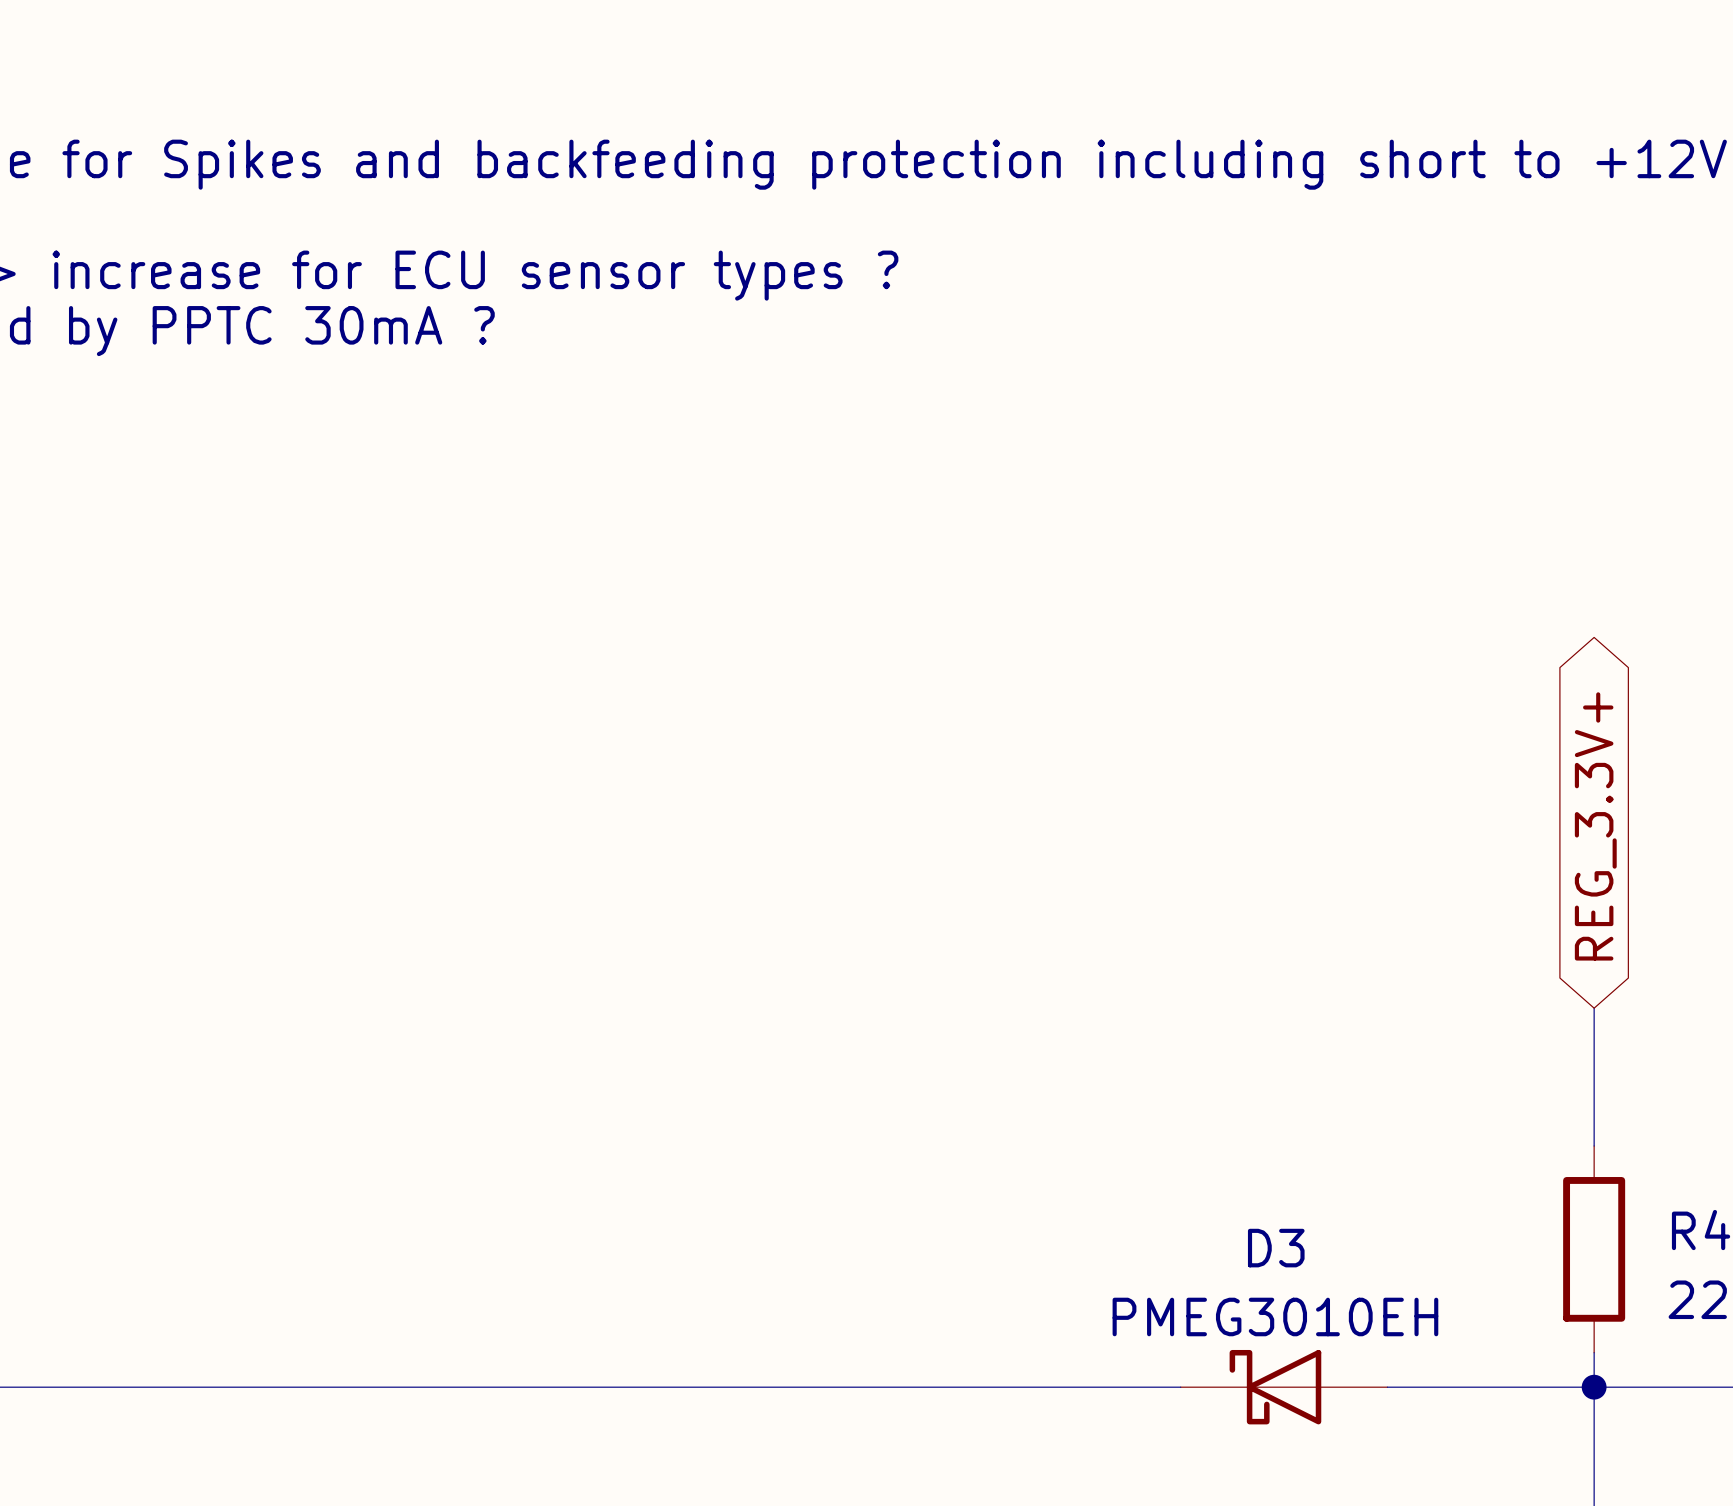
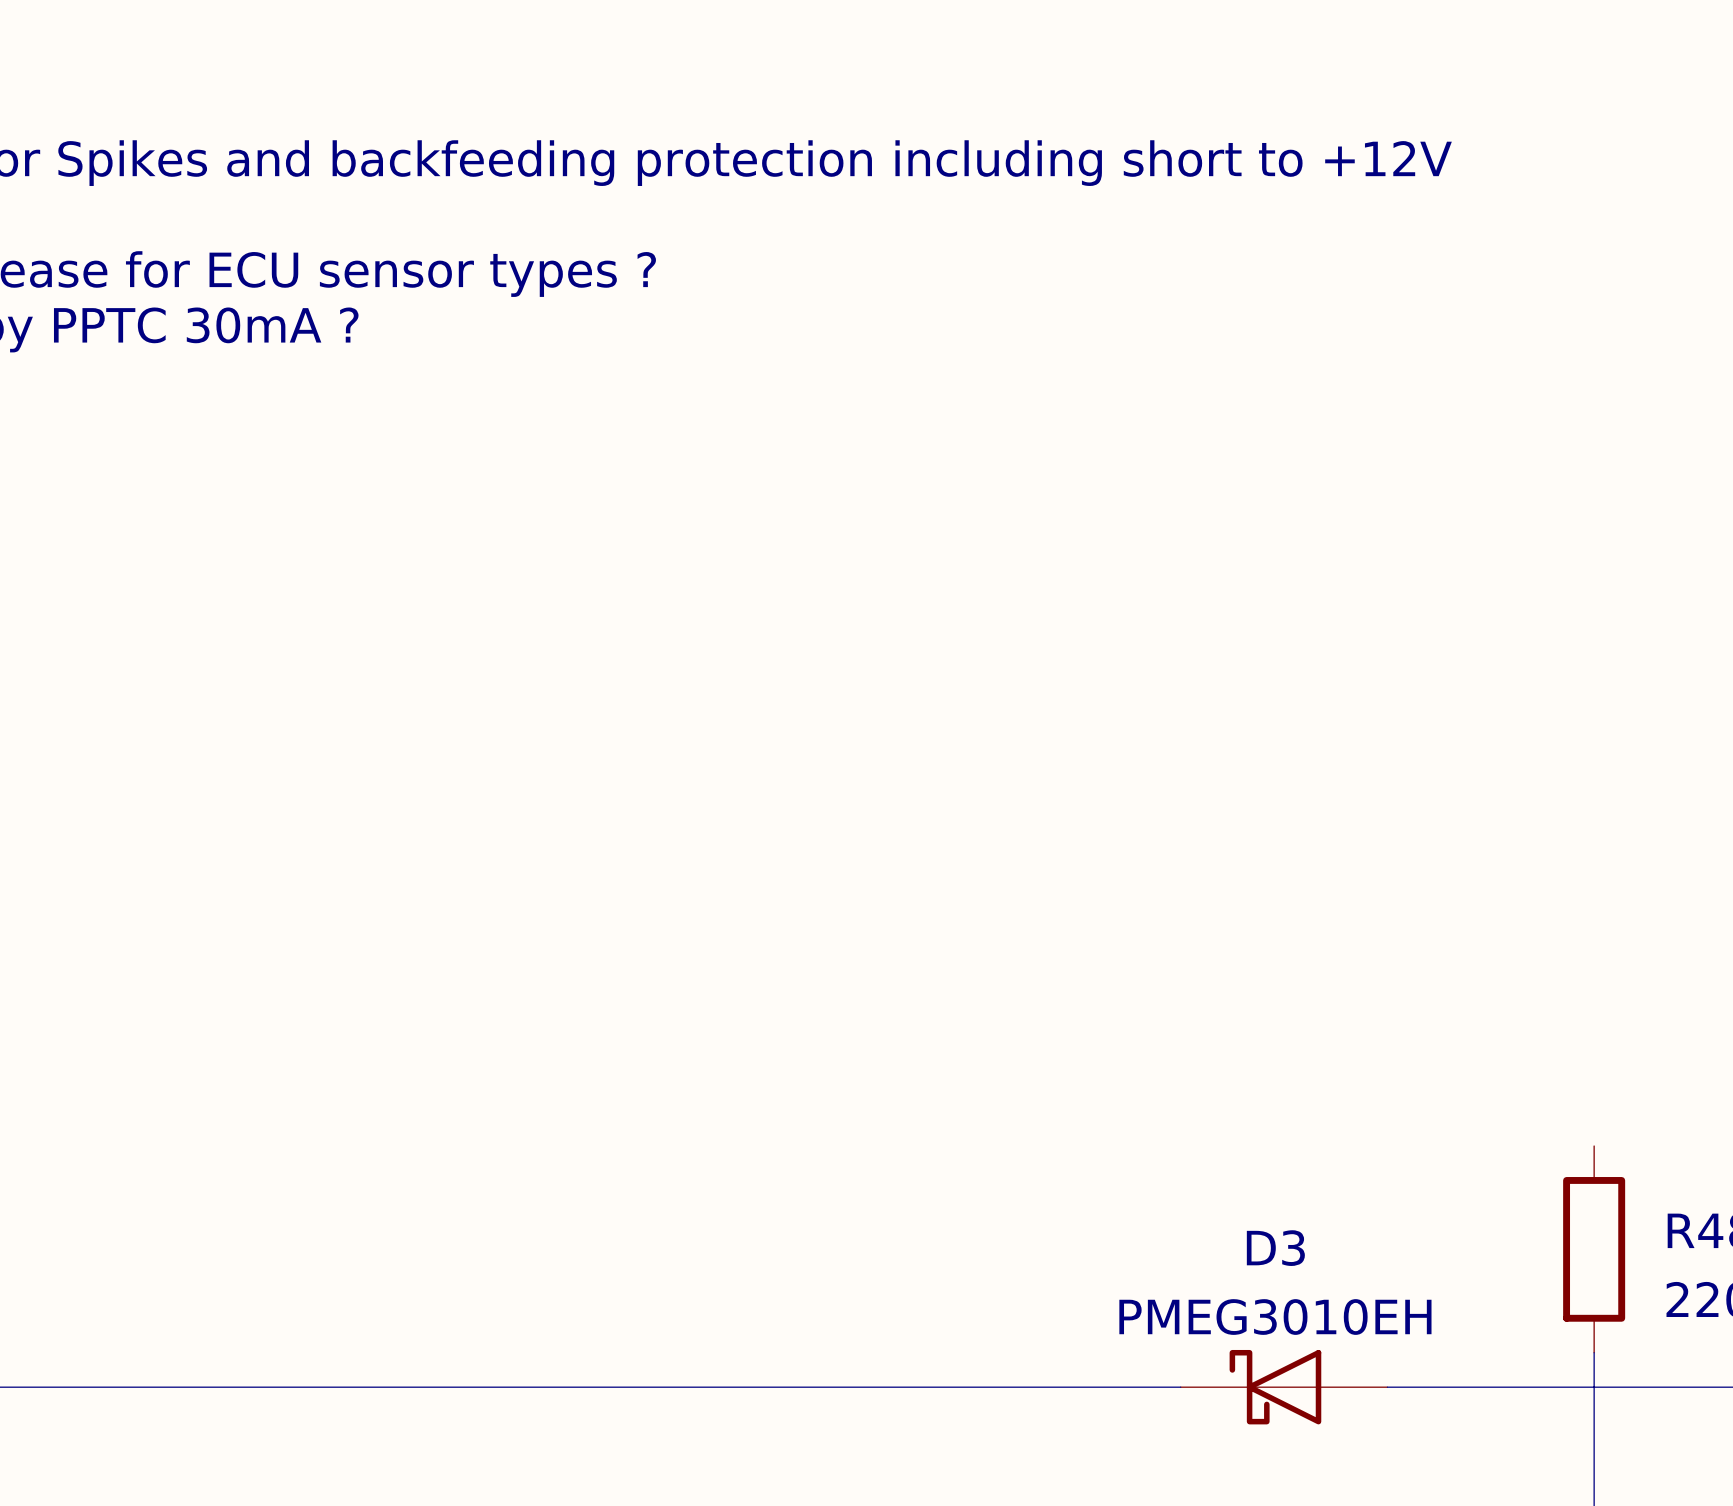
global label: REG_3.3V+ (1595, 826) -> none
wire: (1594, 1008) (1594, 1146) -> none
junction: (1594, 1387) -> none

